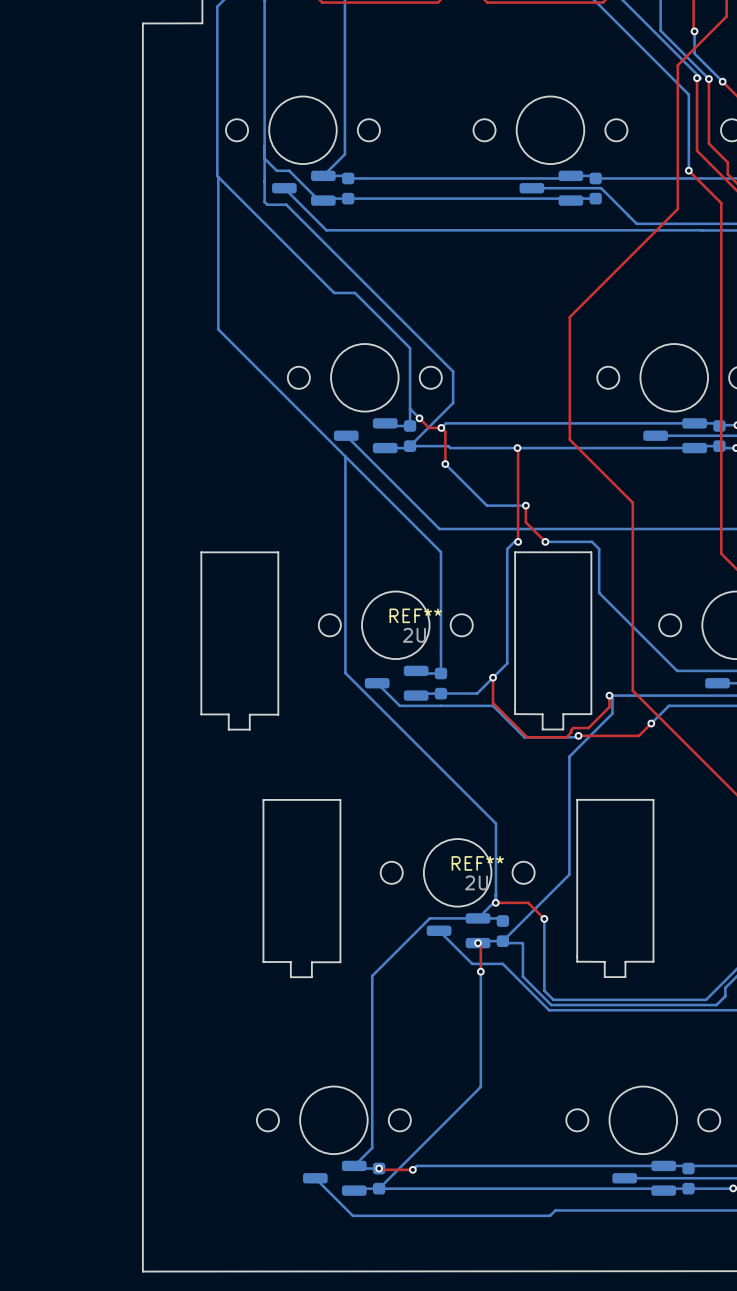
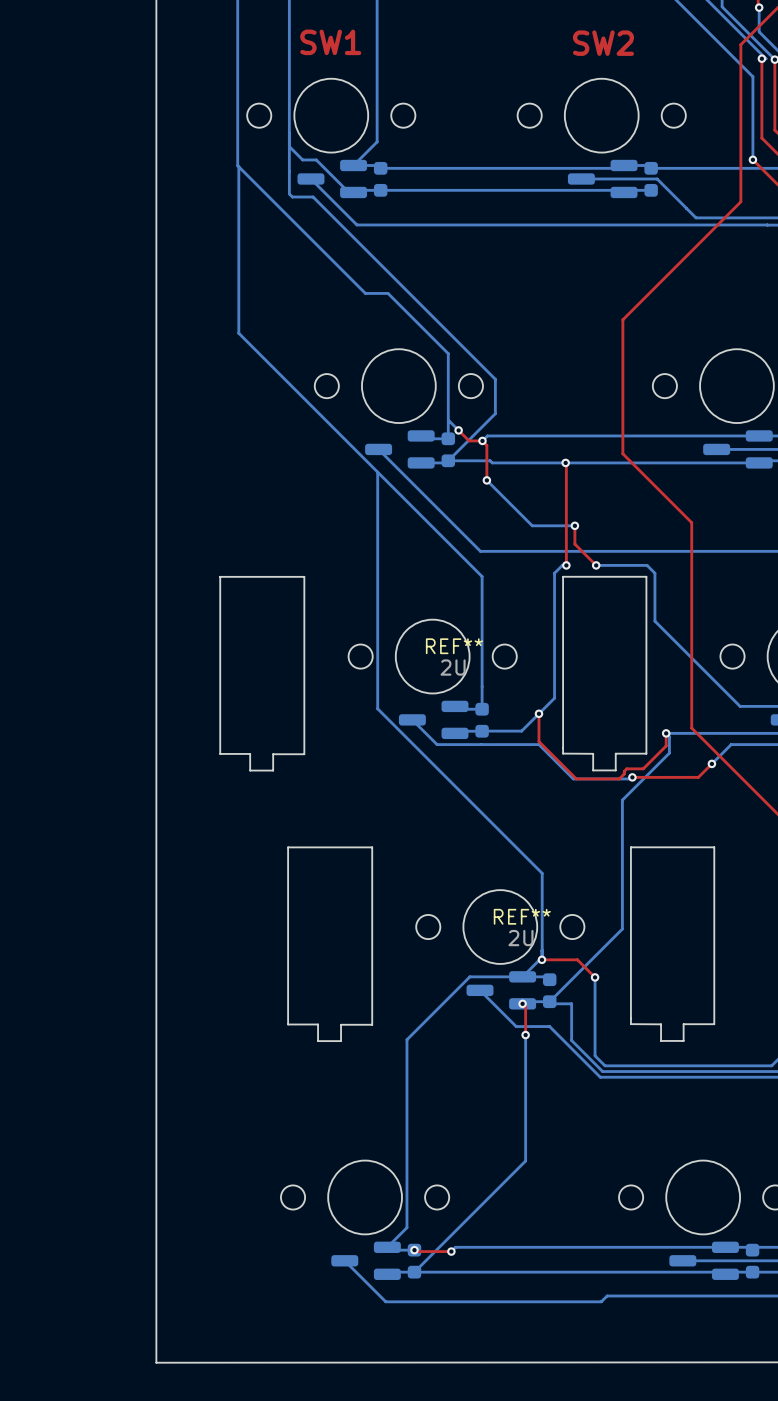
text: none -> SW1 (330, 42)
text: none -> SW2 (603, 43)

